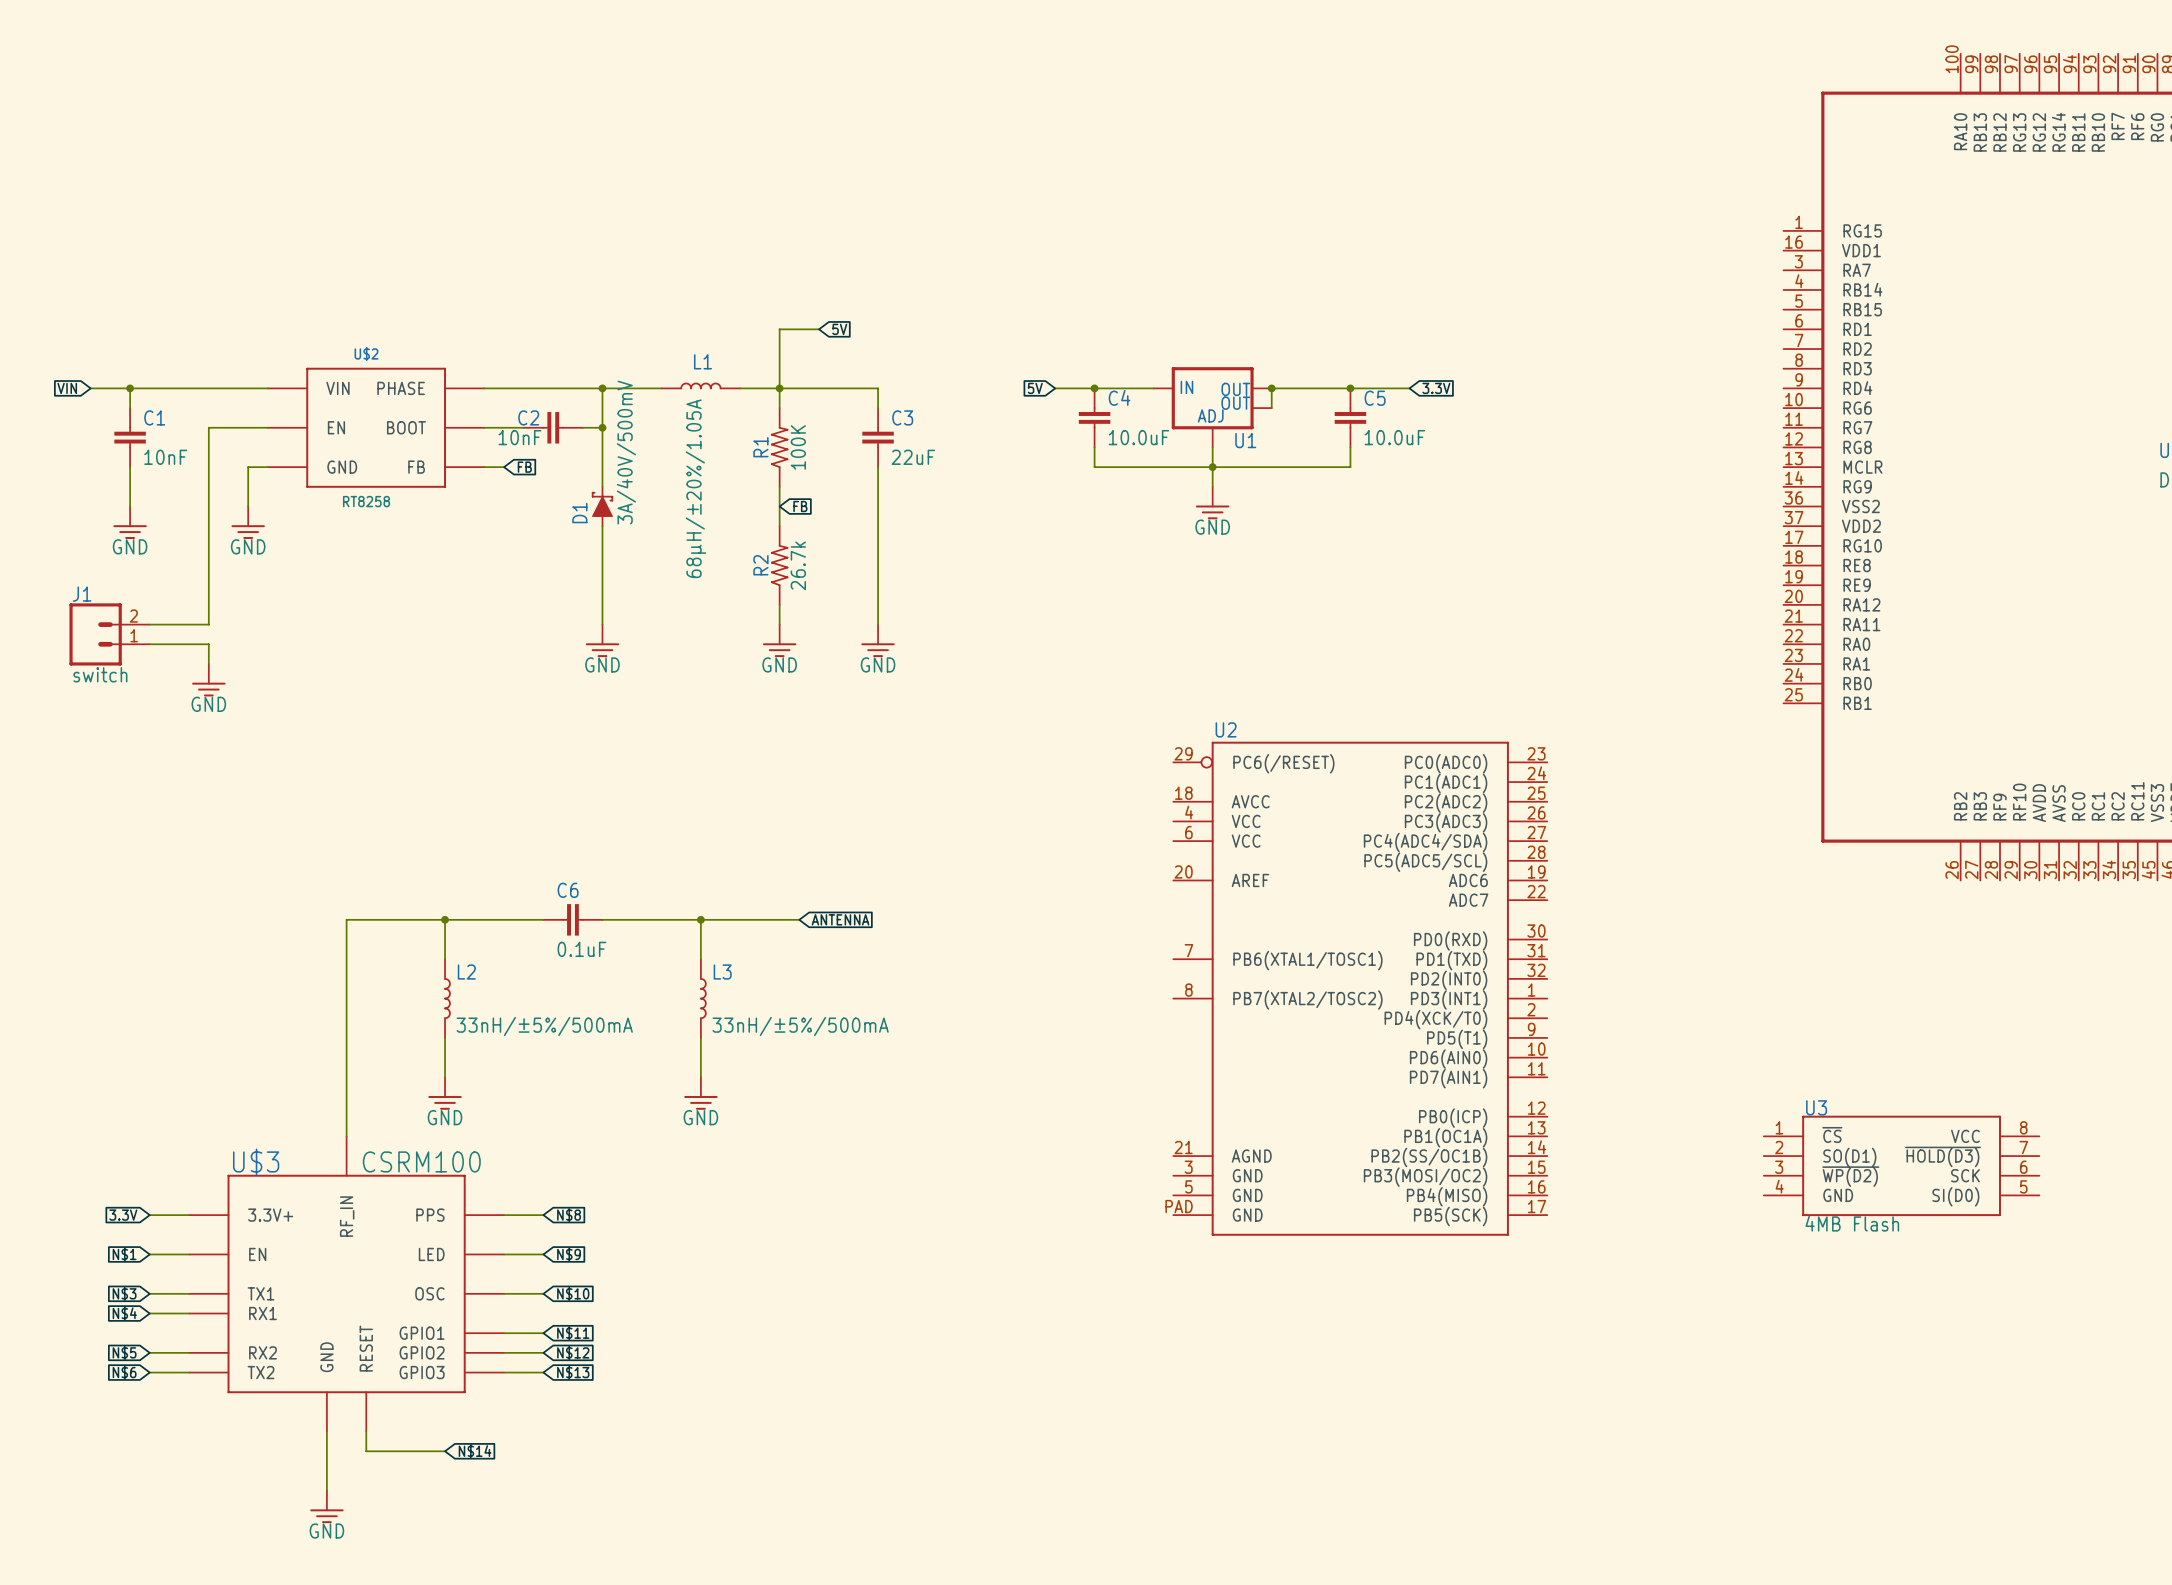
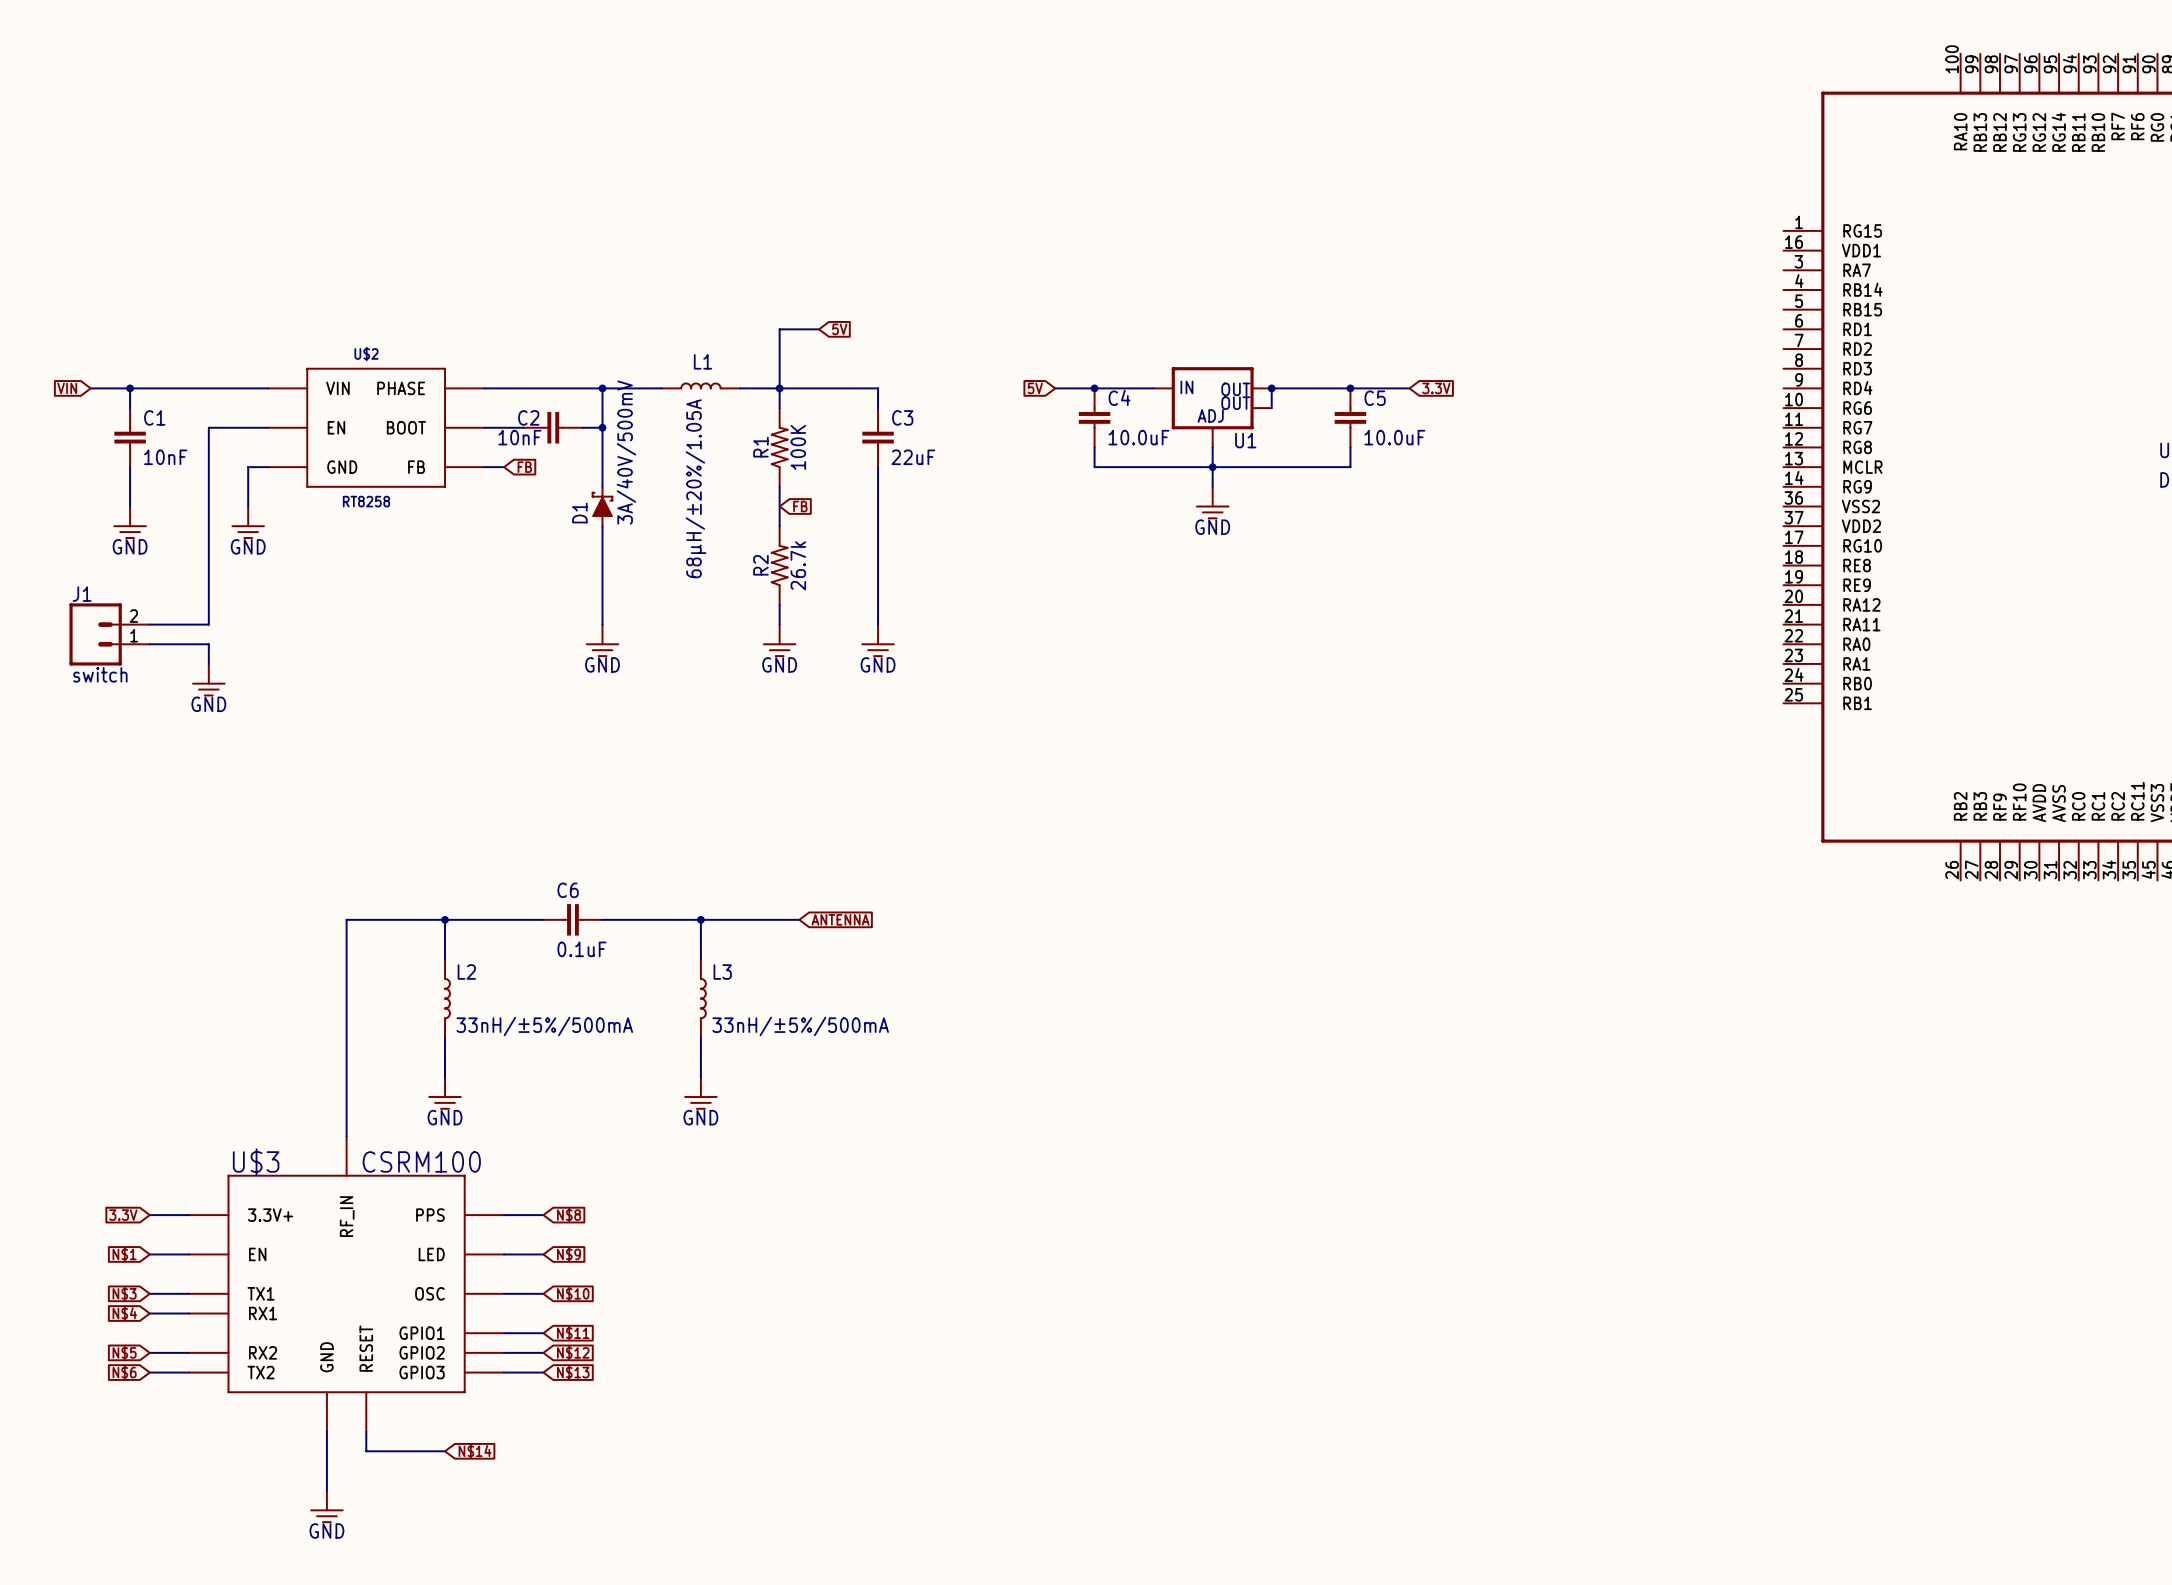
U2: (1360, 988) -> none
U3: 4MB Flash (1901, 1165) -> none

